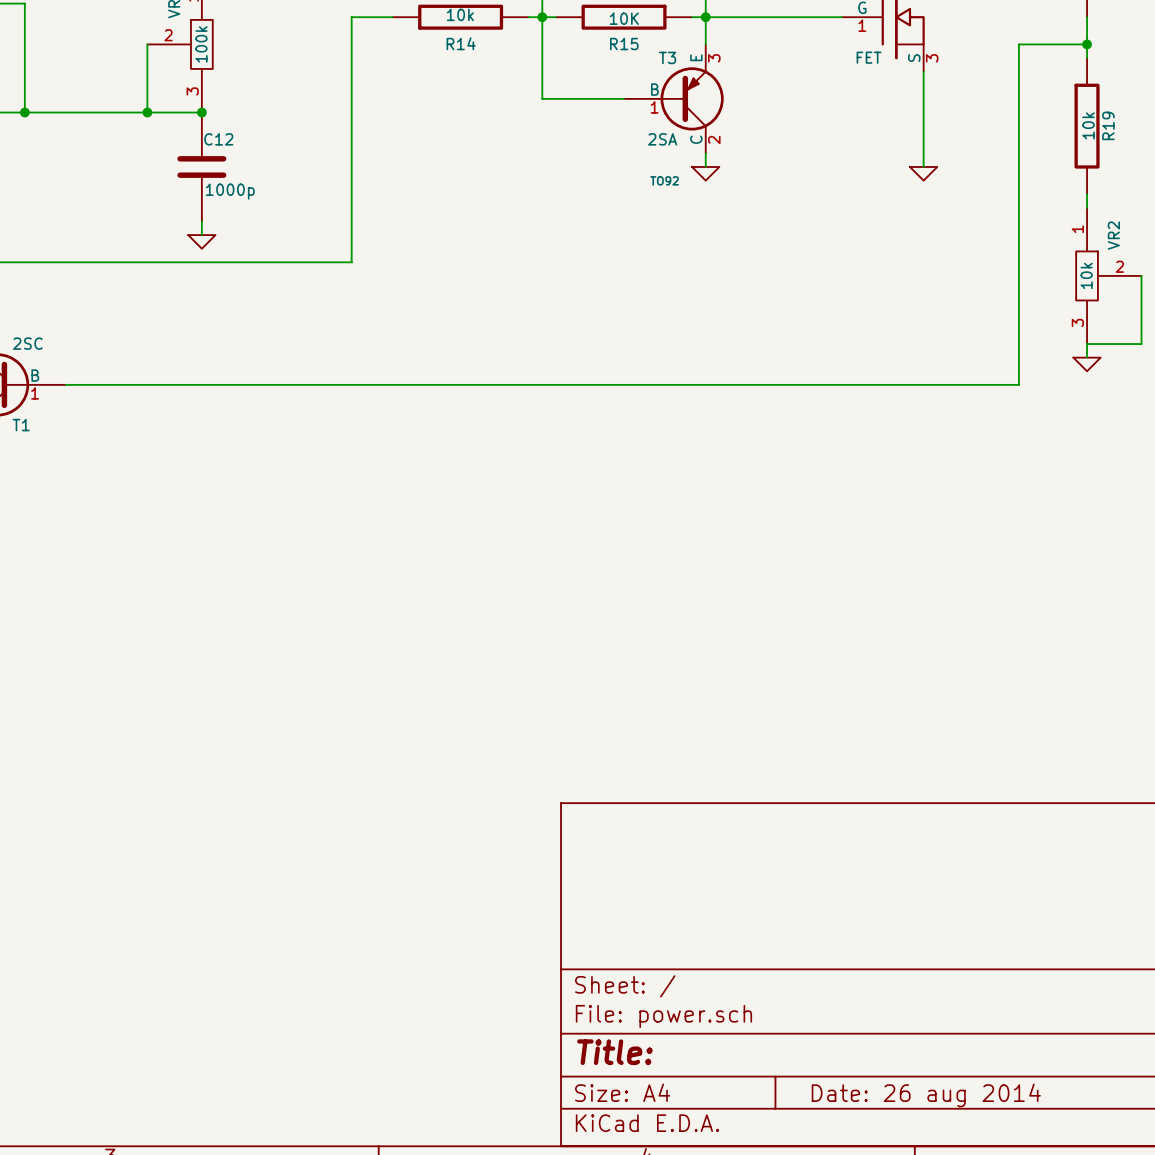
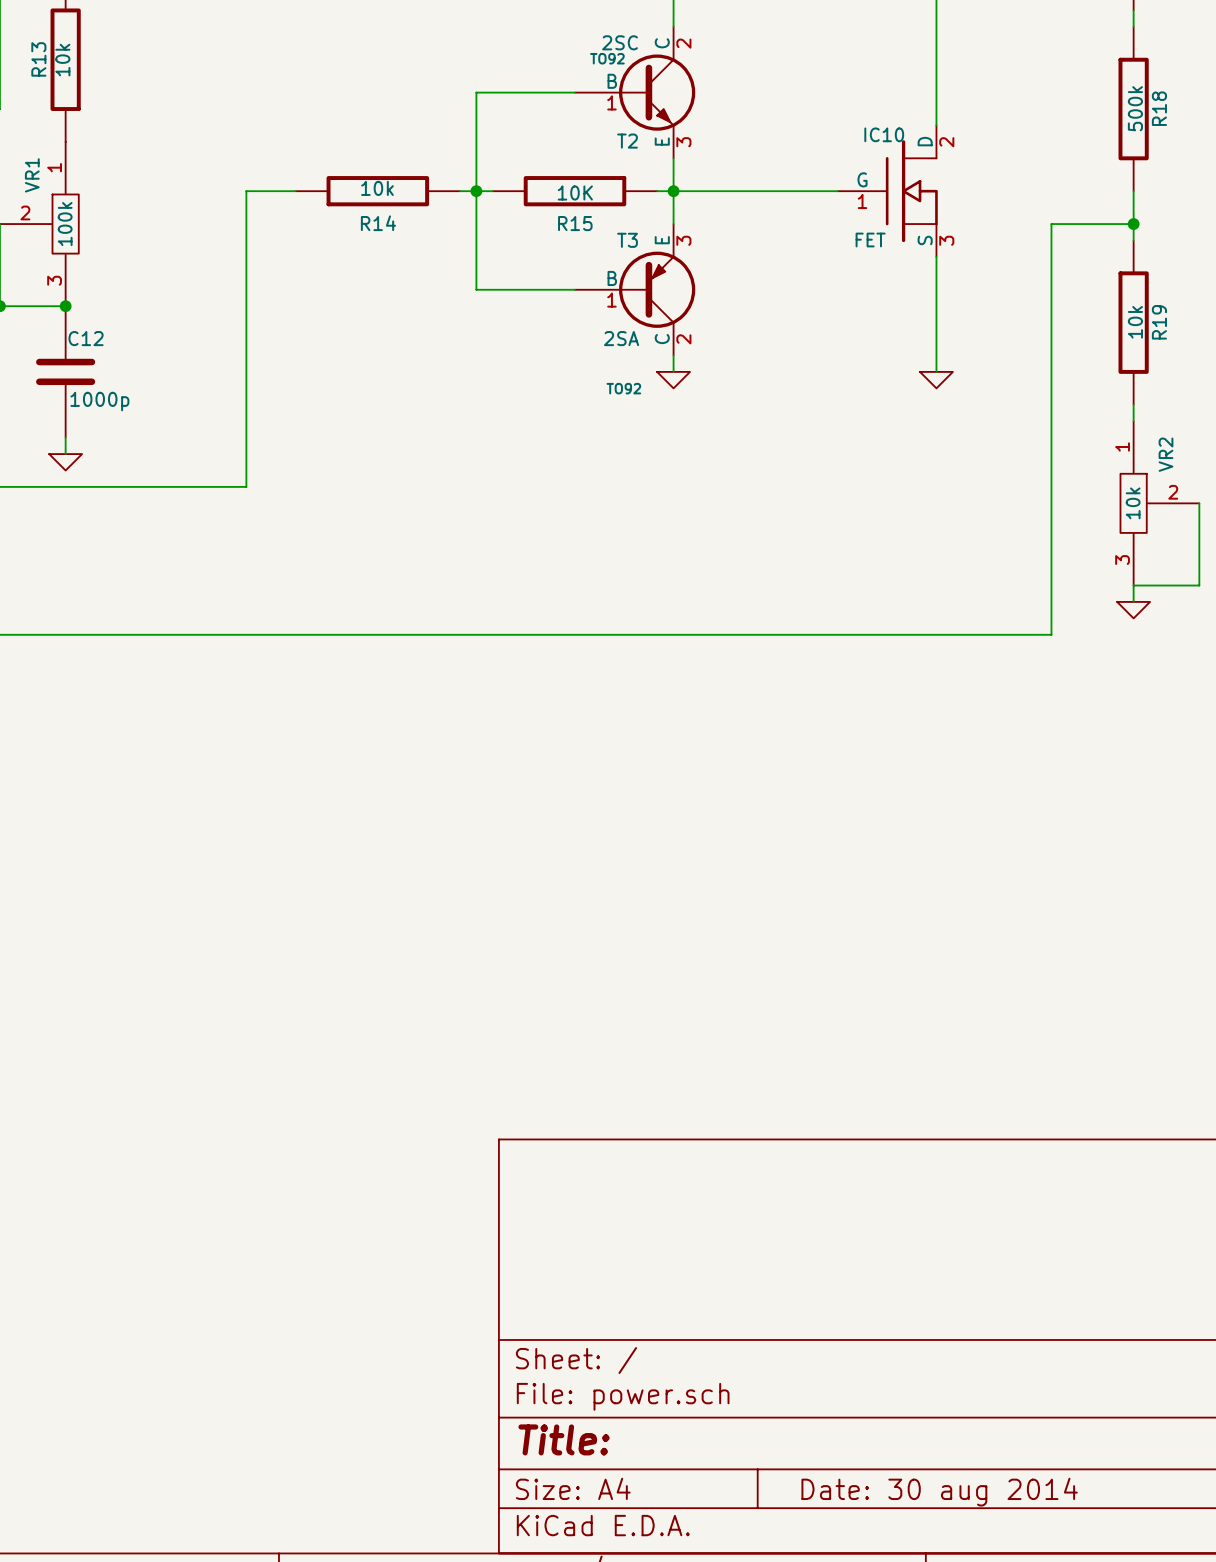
title block: Date: 26 aug 2014 (926, 1095) -> Date: 30 aug 2014 (939, 1492)

